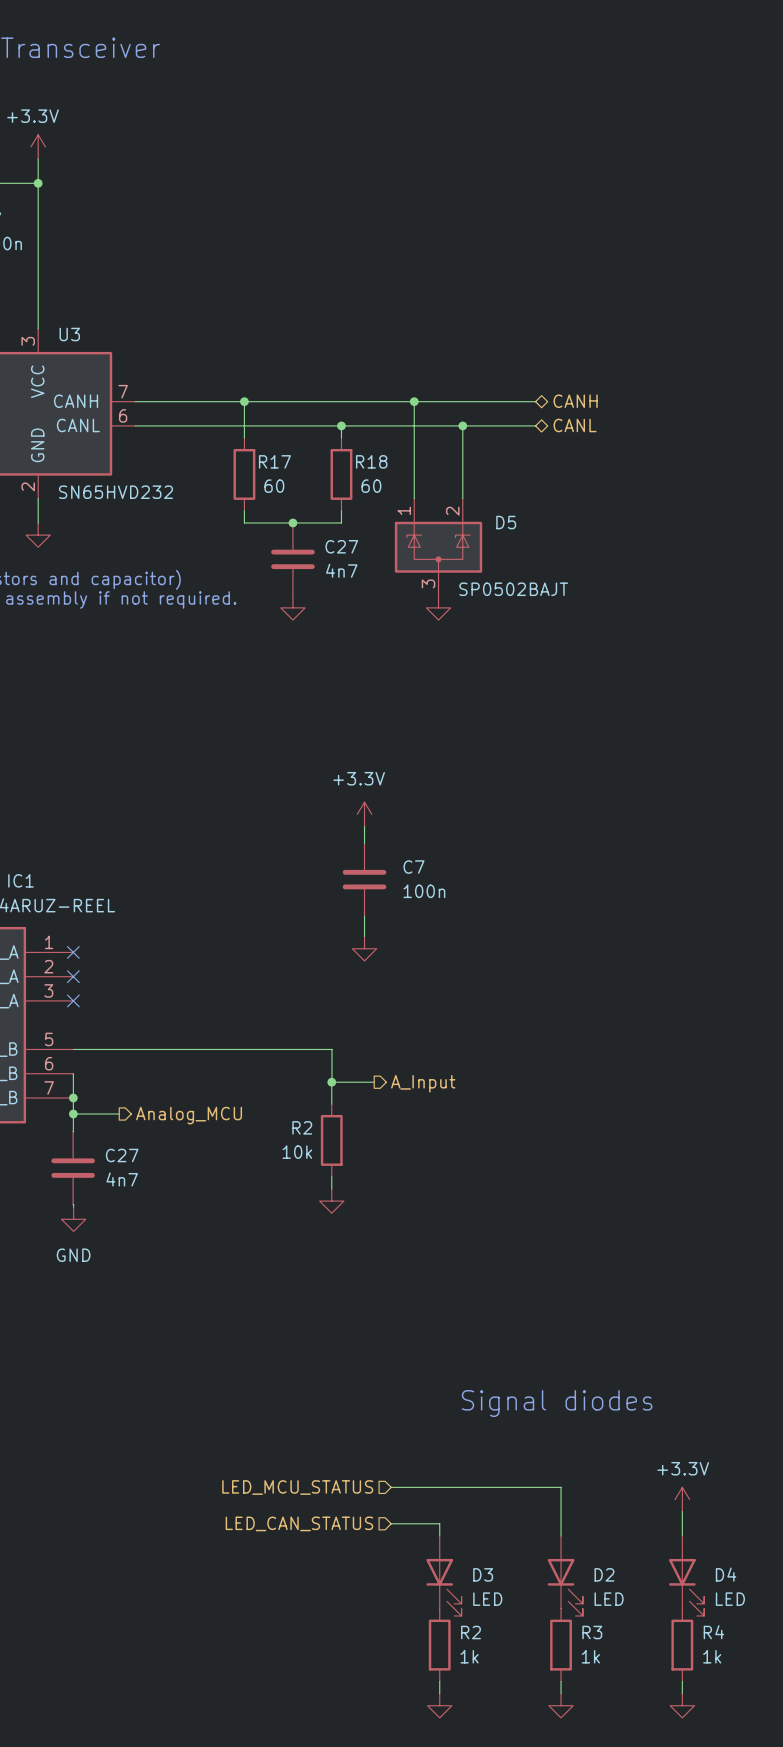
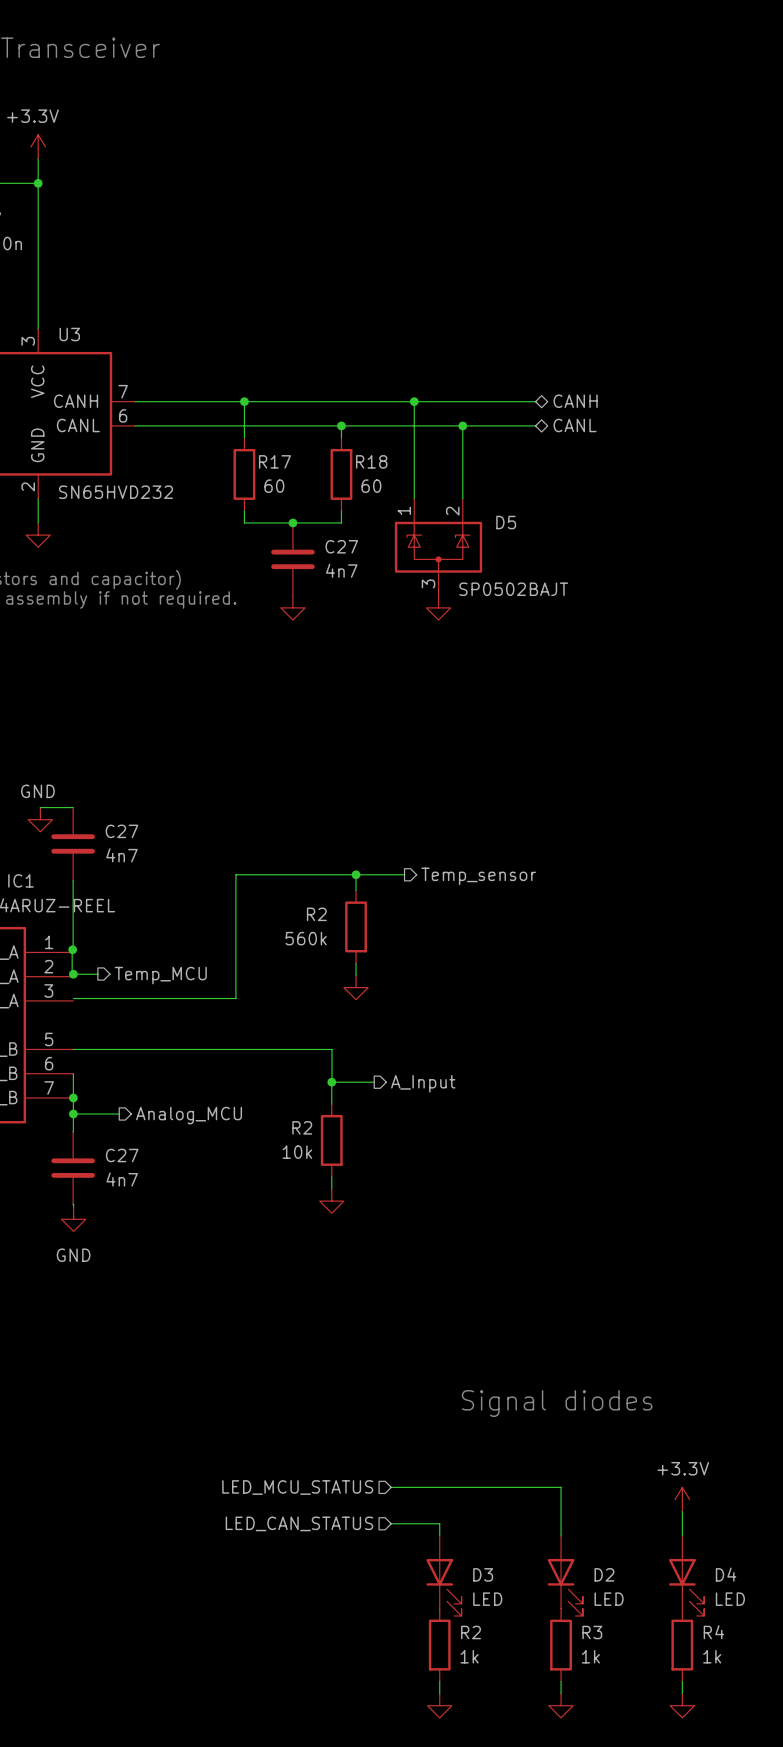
wire: none -> (40, 807) (73, 807)
power symbol: +3.3V (364, 814) -> none
power symbol: none -> GND (40, 819)
wire: (364, 826) (364, 843) -> none
C27: none -> 4n7 (73, 843)
wire: none -> (356, 874) (356, 890)
junction: none -> (356, 874)
wire: none -> (404, 874) (235, 874) (235, 998) (73, 998)
hierarchical label: none -> Temp_sensor (478, 876)
C7: 100n (364, 879) -> none
wire: none -> (73, 880) (72, 974) (97, 974)
wire: (364, 916) (364, 936) -> none
R2: none -> 560k (356, 926)
power symbol position: (364, 948) -> (356, 987)
junction: none -> (72, 949)
no-connect mark: (73, 952) -> none
wire: none -> (356, 963) (356, 975)
junction: none -> (73, 974)
hierarchical label: none -> Temp_MCU (160, 975)
no-connect mark: (73, 976) -> none
no-connect mark: (73, 1000) -> none

